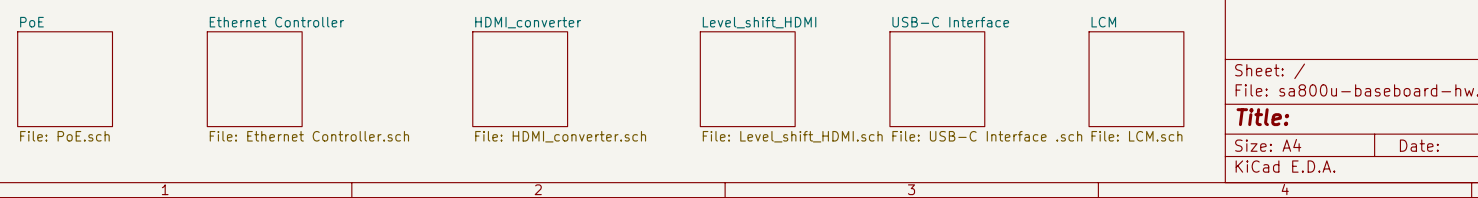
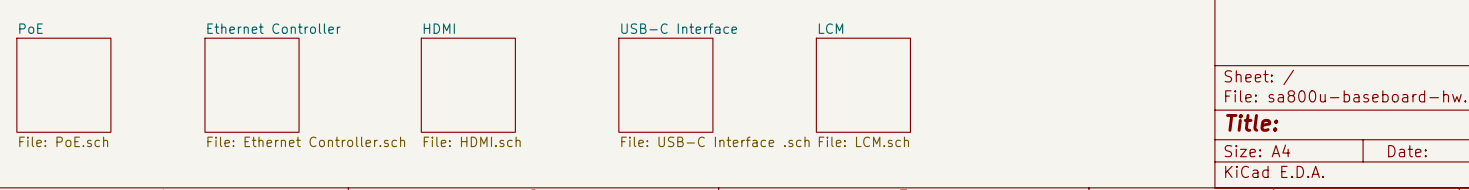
sheet HDMI: none -> File: HDMI.sch (468, 85)
sheet HDMI_converter: File: HDMI_converter.sch (520, 79) -> none
sheet USB-C Interface: none -> File: USB-C Interface .sch (665, 85)
sheet Level_shift_HDMI: File: Level_shift_HDMI.sch (747, 79) -> none
sheet LCM: none -> File: LCM.sch (863, 85)
sheet USB-C Interface: File: USB-C Interface .sch (937, 79) -> none
sheet LCM: File: LCM.sch (1136, 79) -> none

